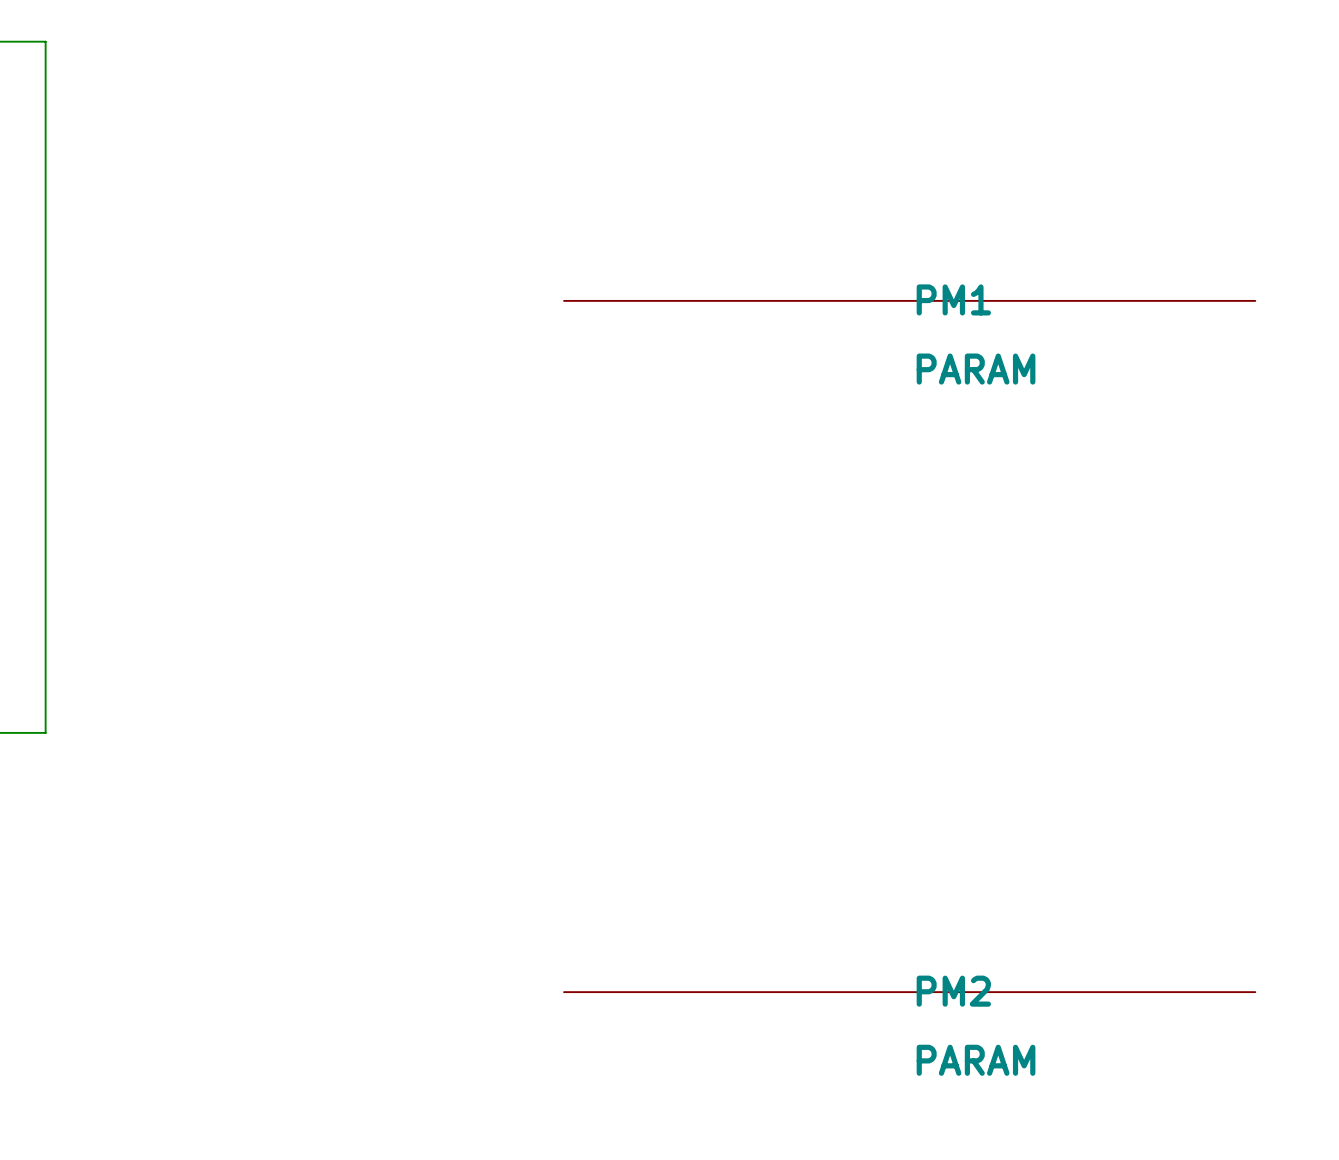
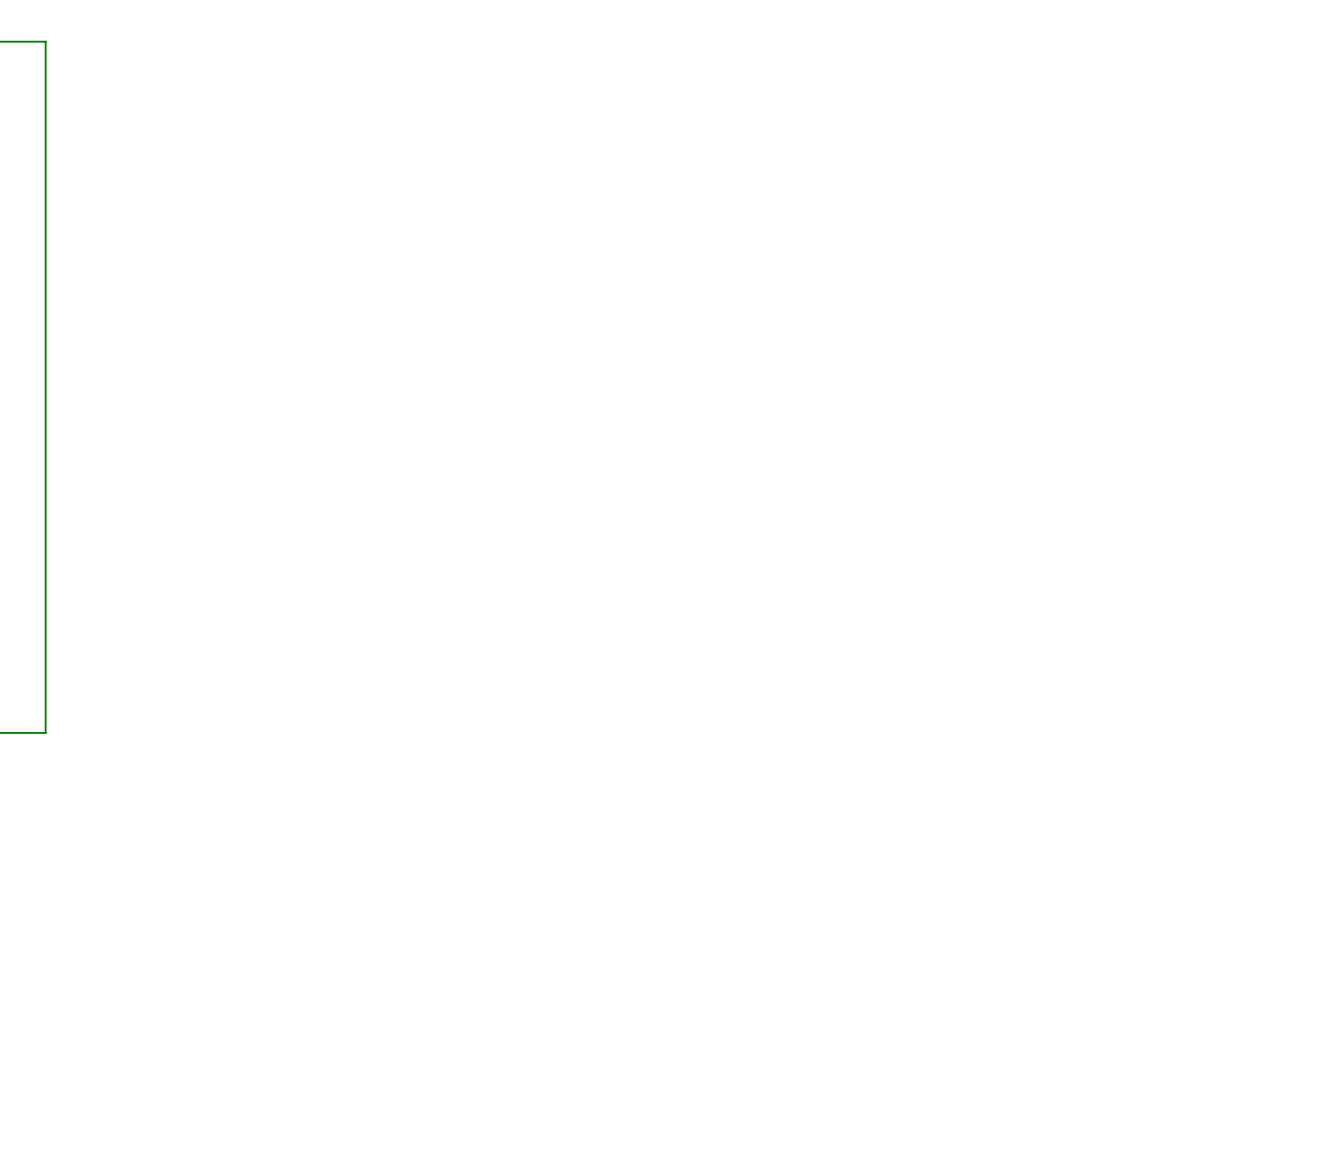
PM1: PARAM (909, 300) -> none
PM2: PARAM (909, 992) -> none

